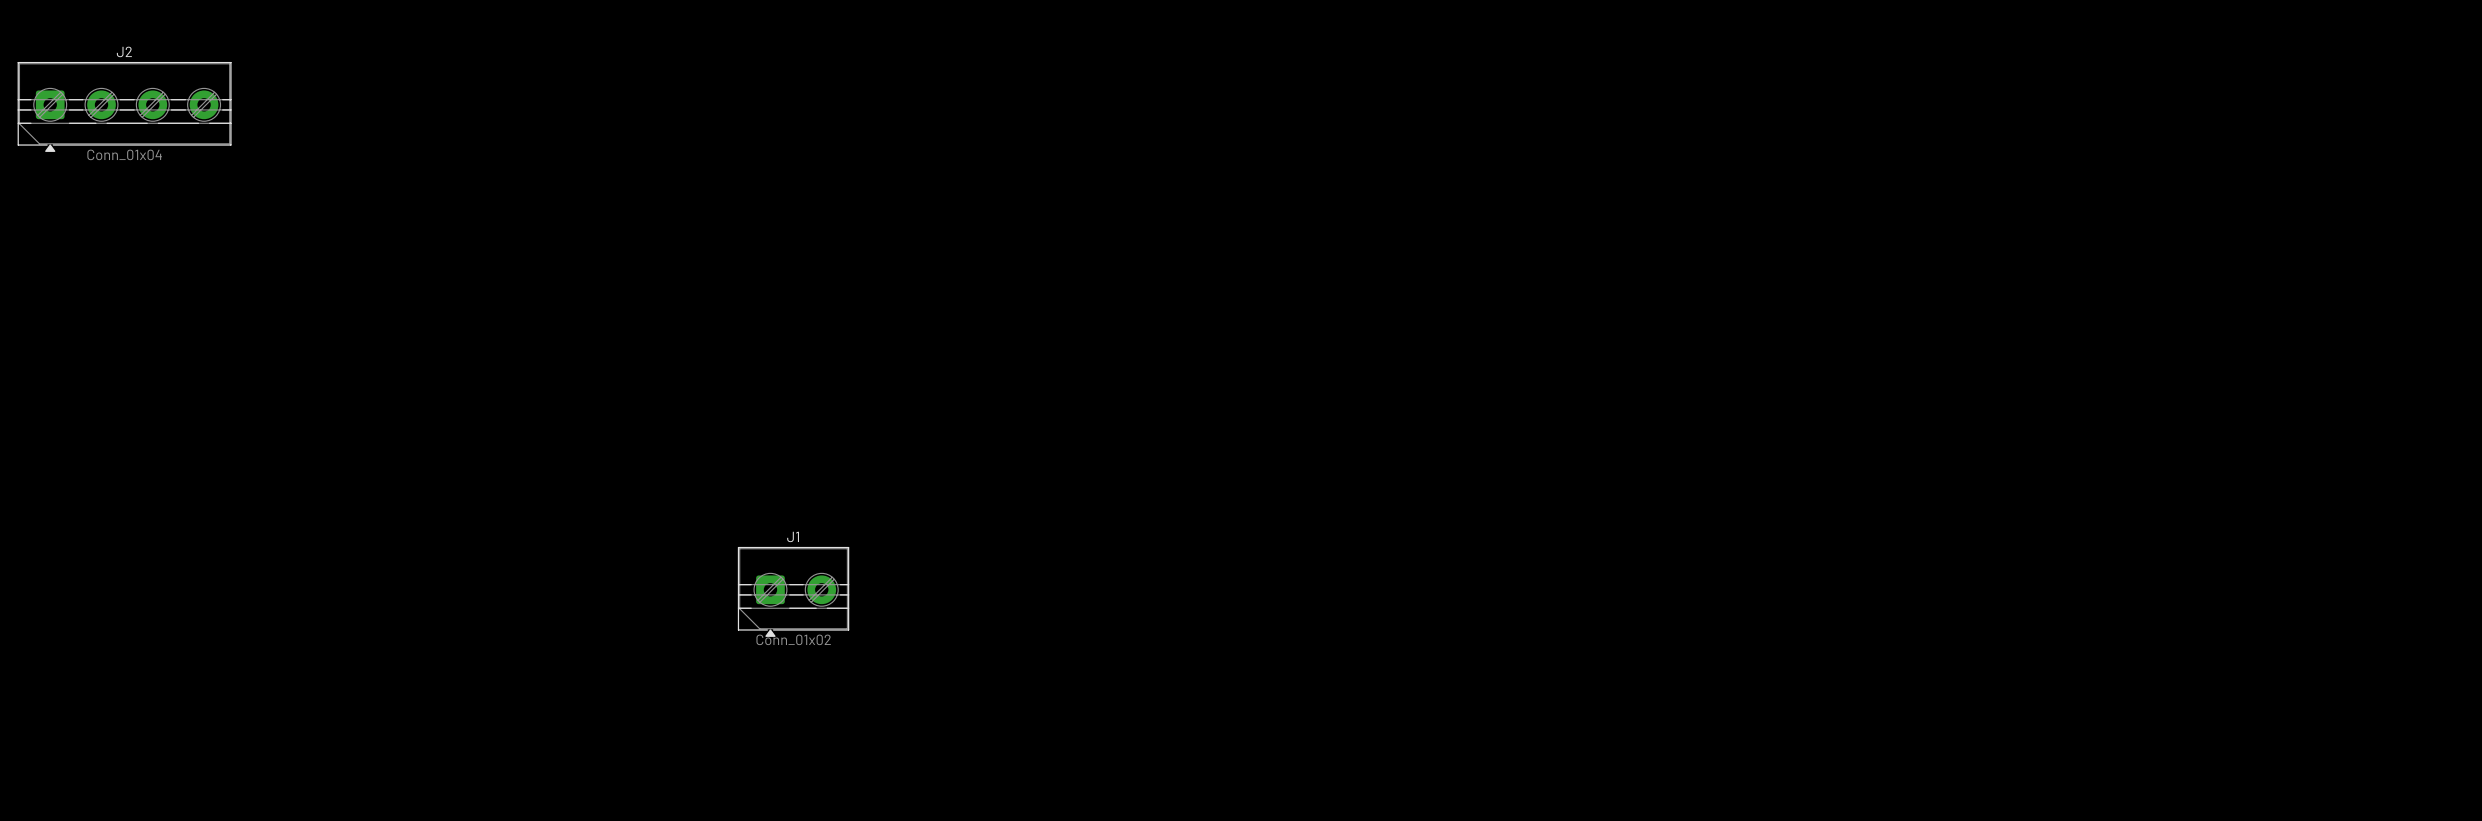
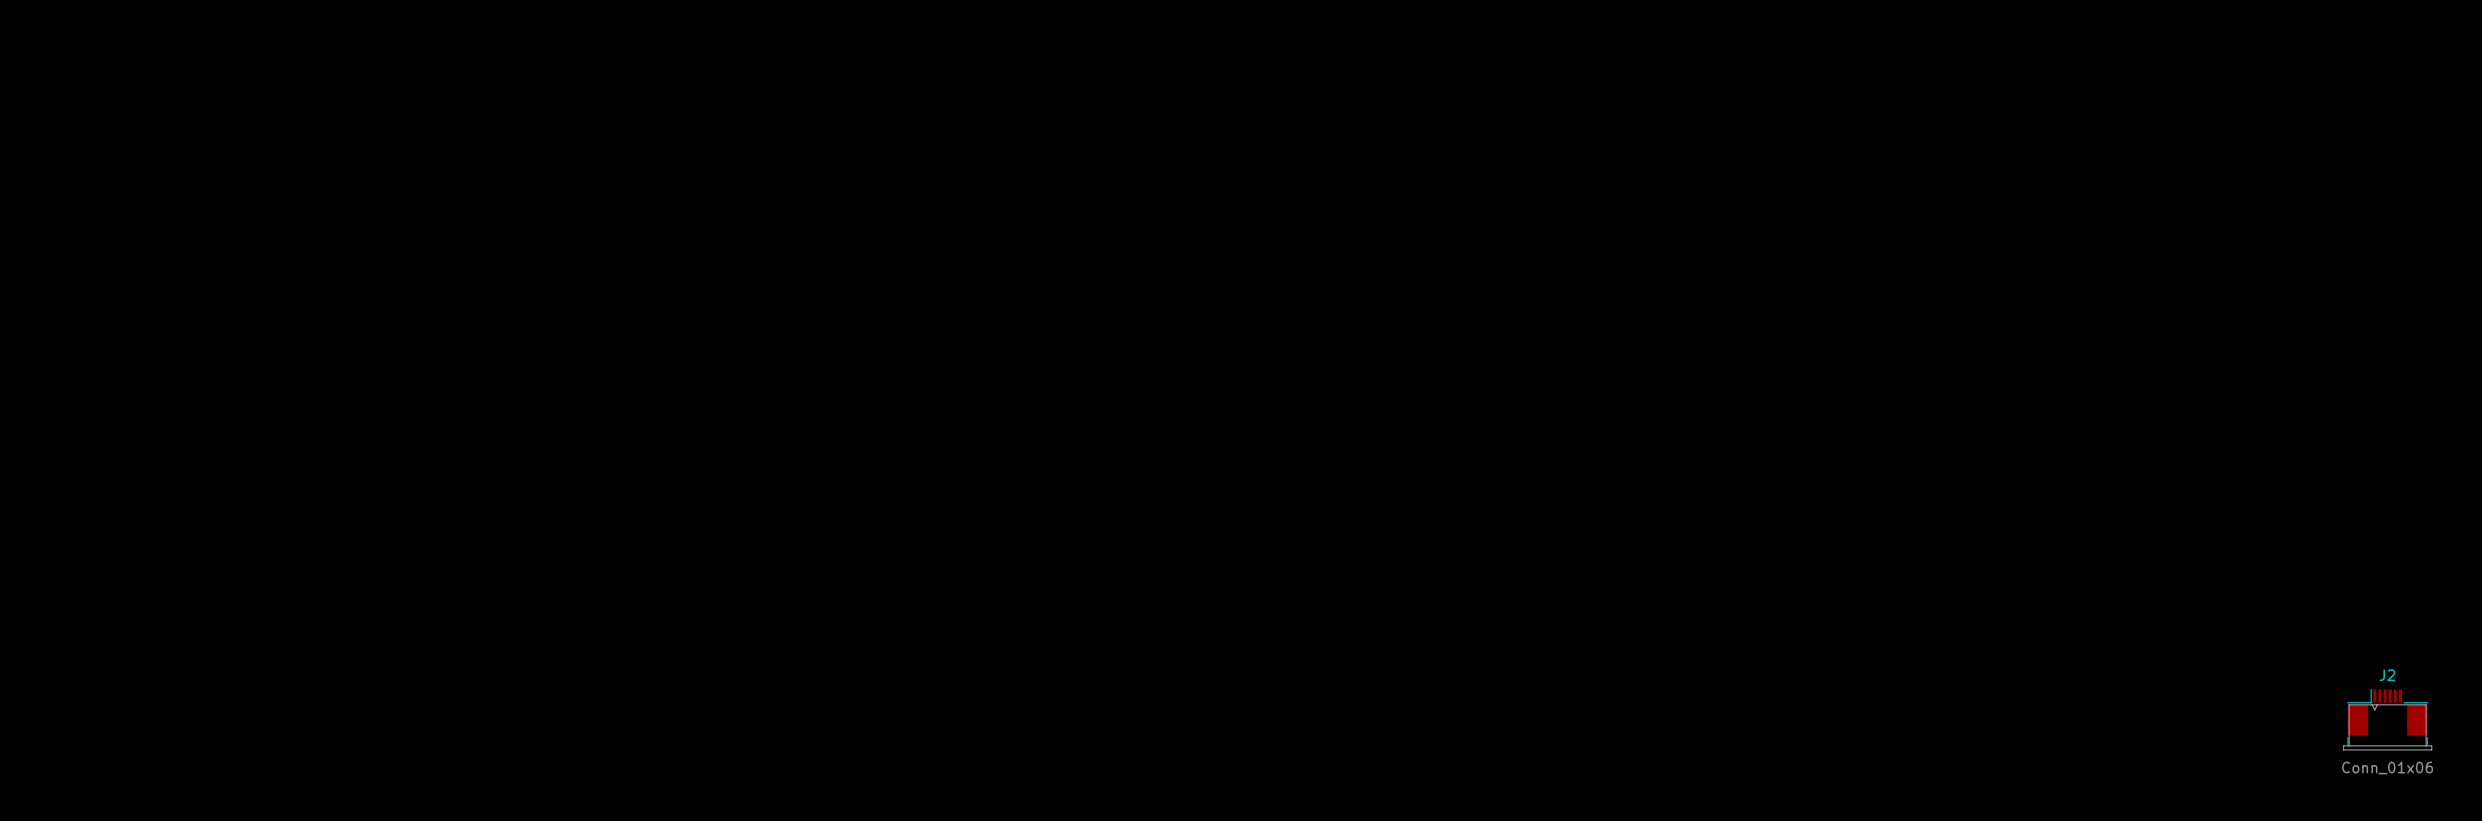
J2 footprint: [17, 61, 232, 152] -> [2343, 688, 2433, 751]
J2 value: Conn_01x04 (124, 154) -> Conn_01x06 (2387, 767)
J1: Conn_01x02 (793, 591) -> none

